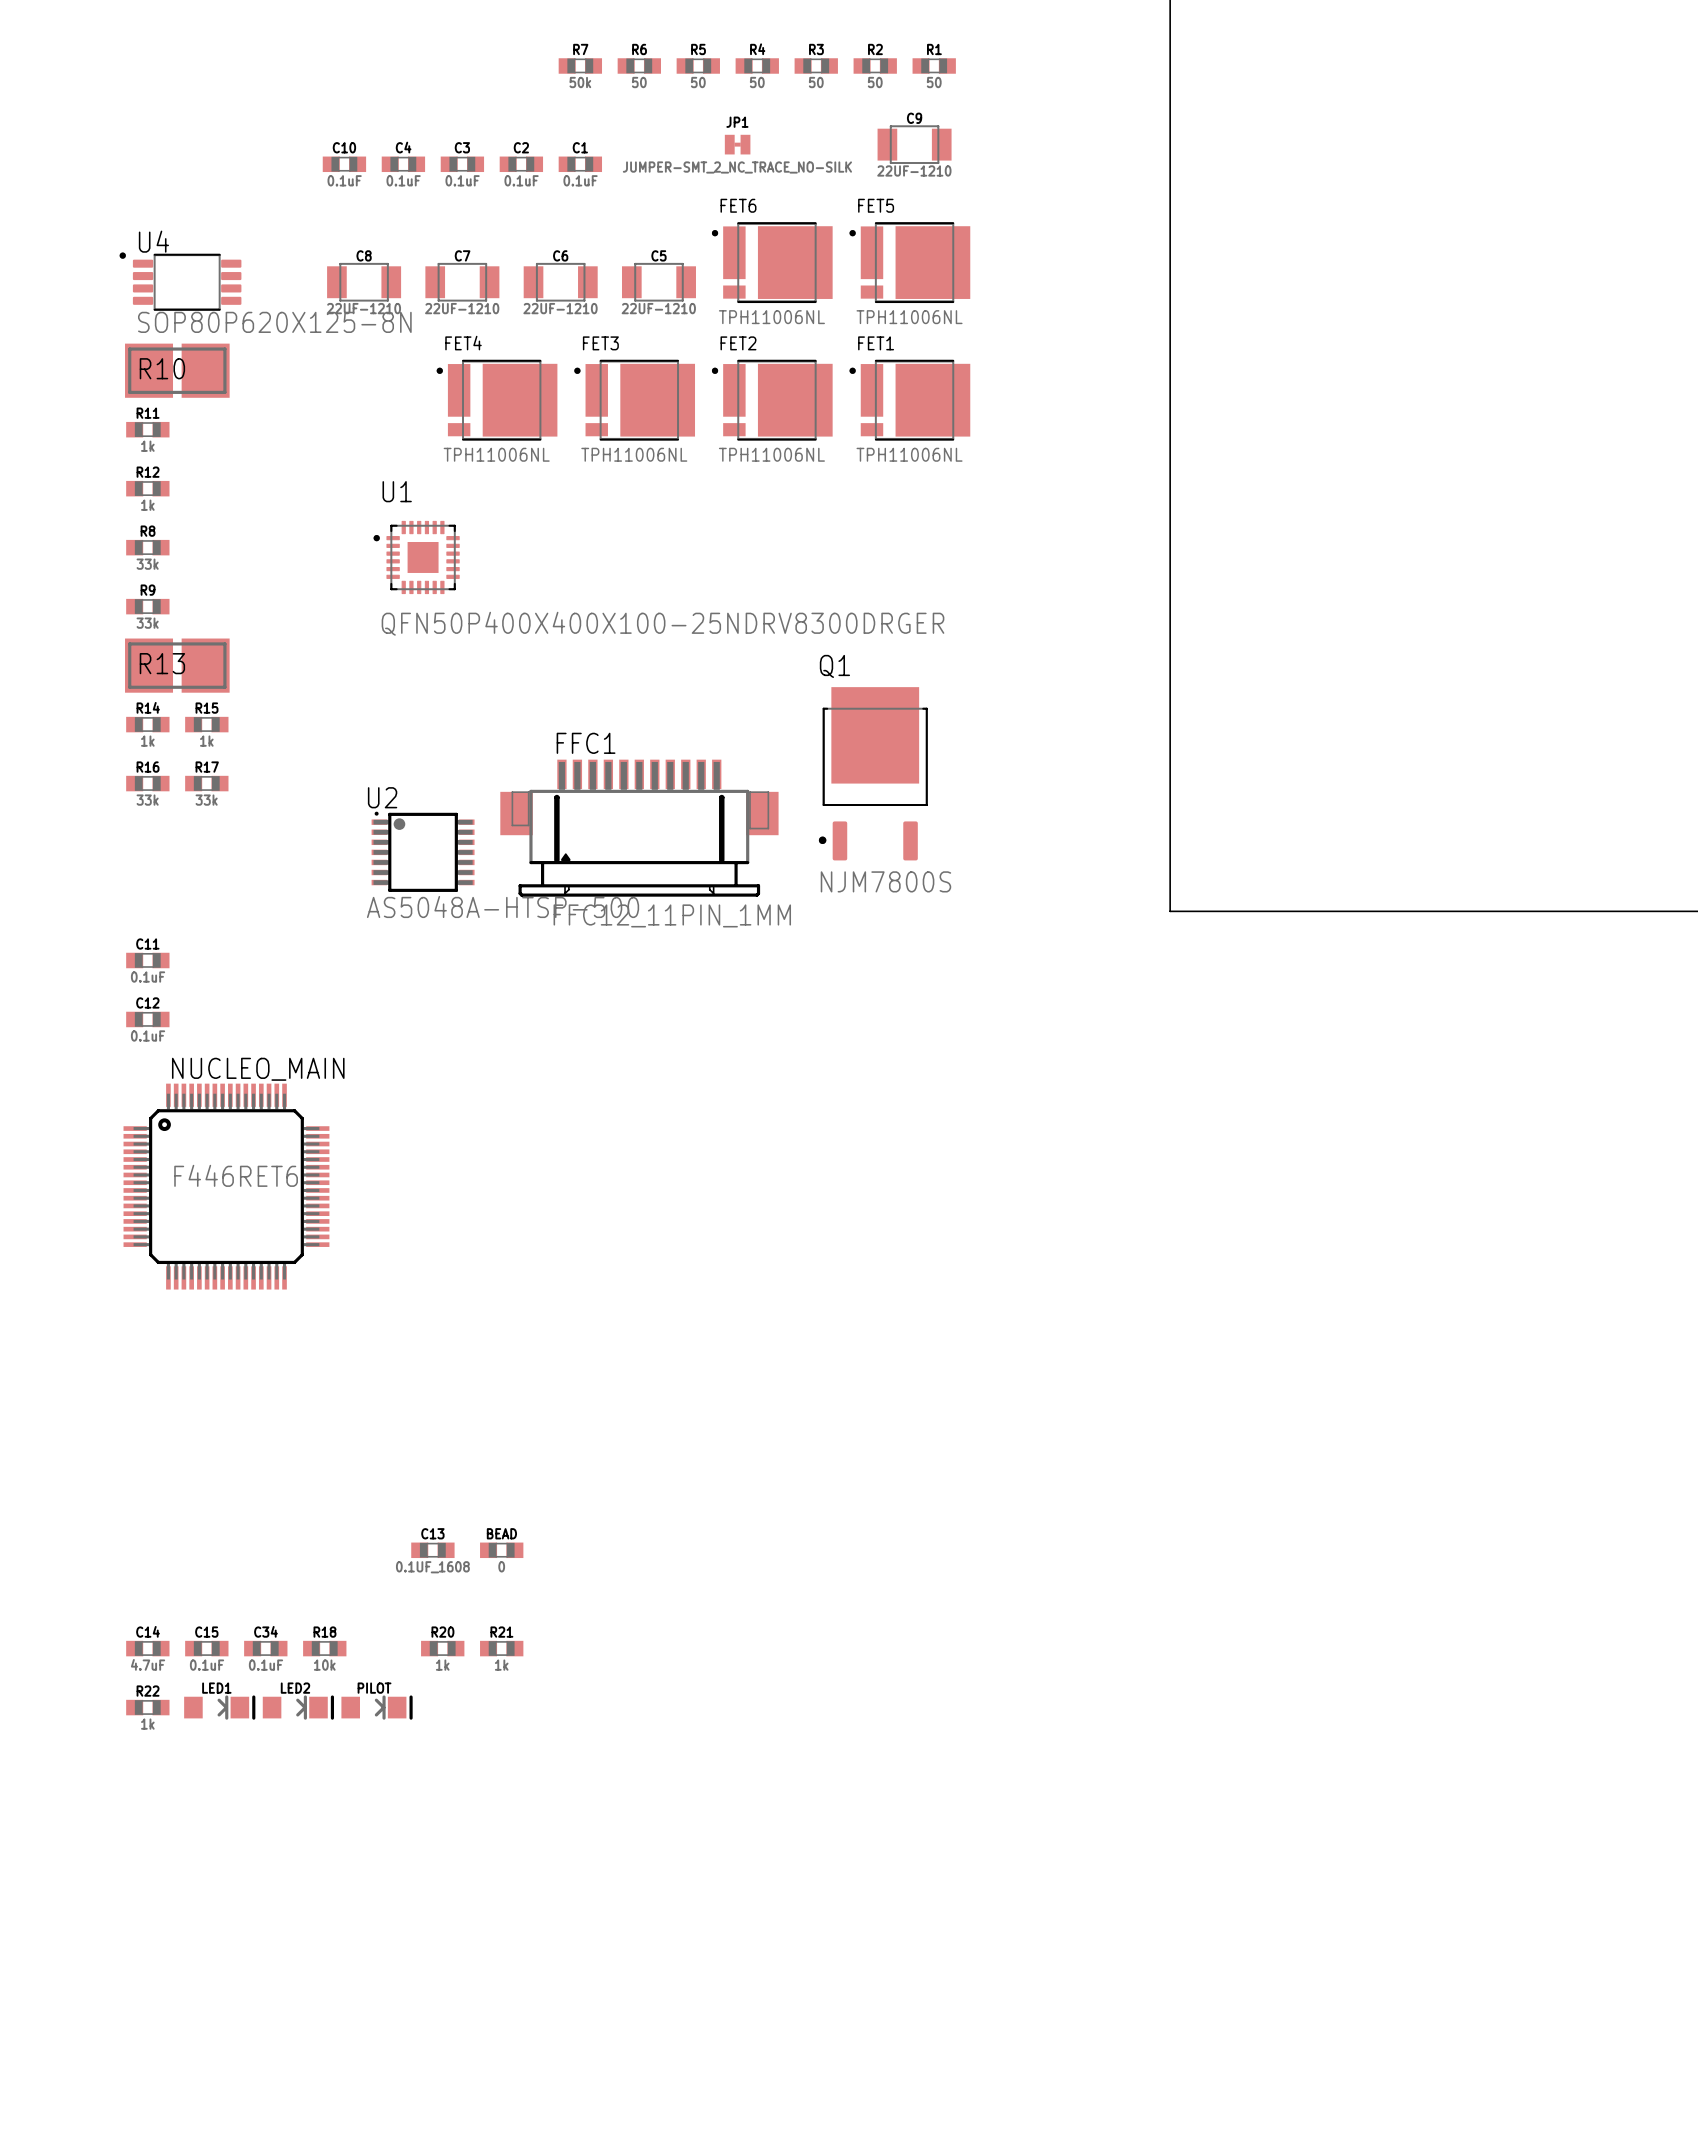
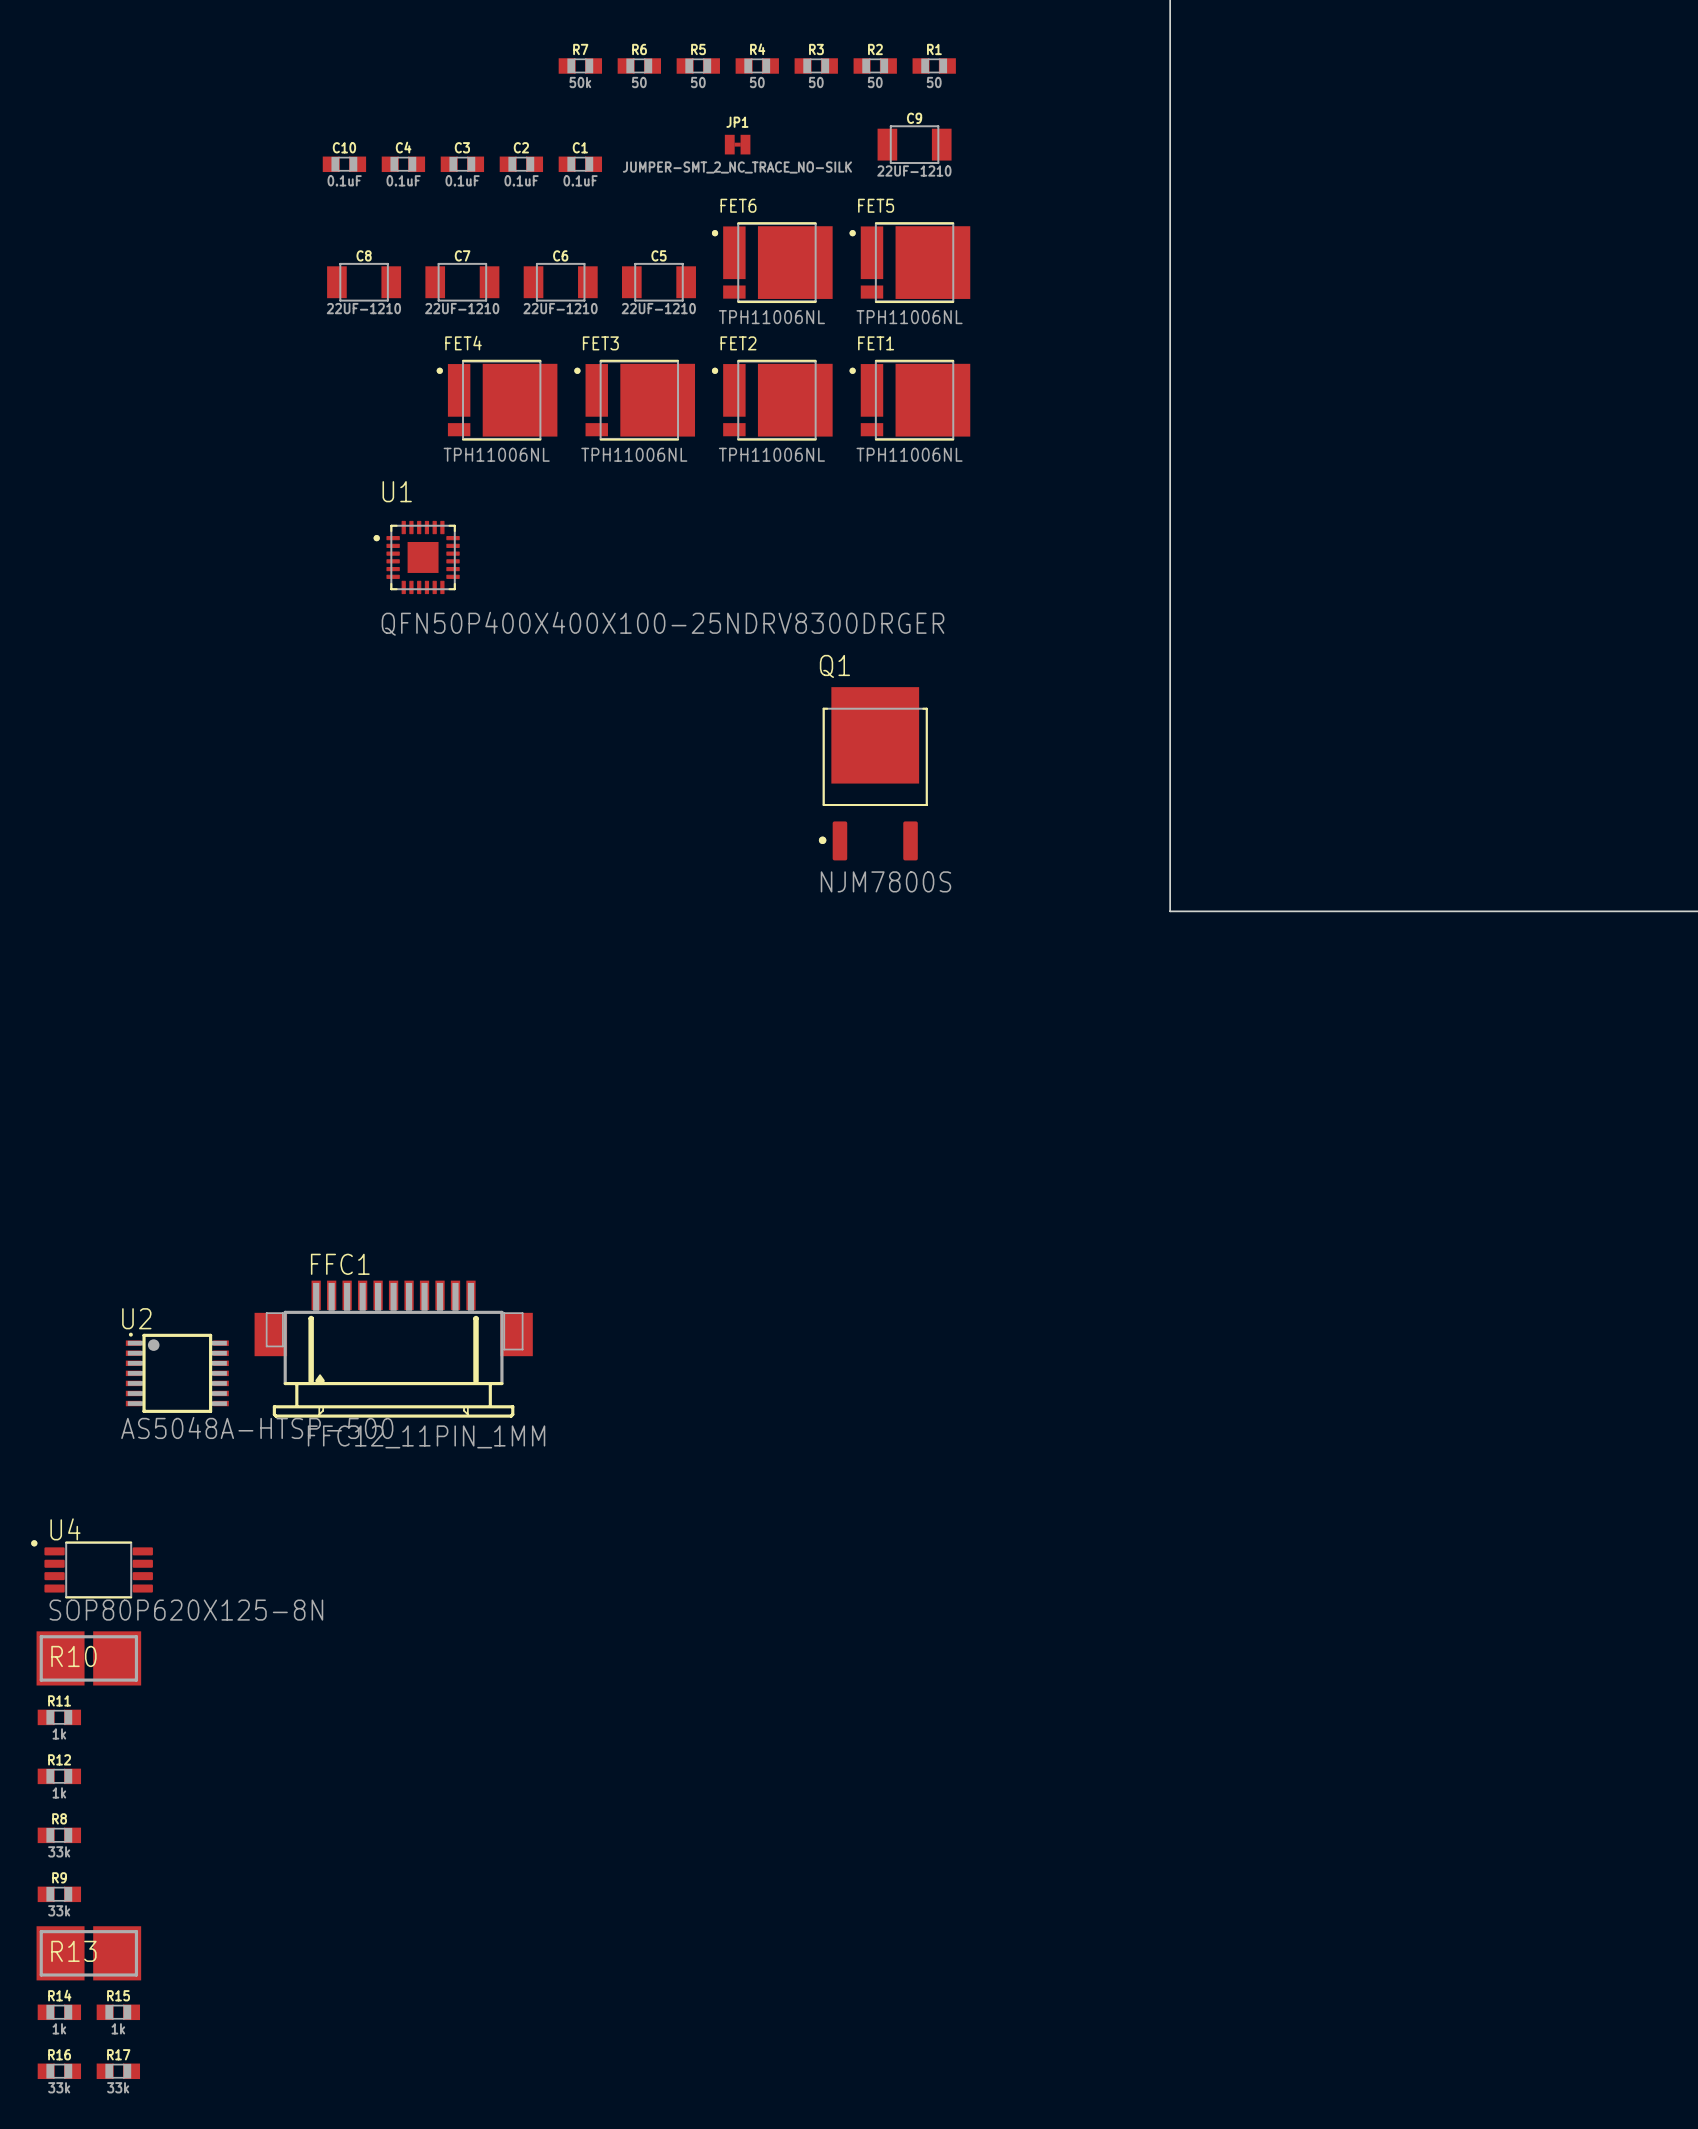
U4 position: (180, 281) -> (92, 1569)
R10 position: (177, 370) -> (88, 1658)
R11 position: (147, 429) -> (59, 1717)
R12 position: (147, 488) -> (59, 1776)
R8 position: (147, 547) -> (59, 1835)
R9 position: (147, 606) -> (59, 1894)
R13 position: (177, 665) -> (88, 1953)
R14 position: (147, 724) -> (59, 2012)
R15 position: (206, 724) -> (118, 2012)
R16 position: (147, 783) -> (59, 2071)
R17 position: (206, 783) -> (118, 2071)
FFC1 position: (639, 828) -> (393, 1349)
U2 position: (423, 851) -> (177, 1372)
C11: 0.1uF (147, 960) -> none
C12: 0.1uF (147, 1019) -> none
NUCLEO_MAIN: F446RET6 (226, 1186) -> none
C13: 0.1UF_1608 (432, 1550) -> none
BEAD: 0 (501, 1550) -> none
C14: 4.7uF (147, 1648) -> none
C15: 0.1uF (206, 1648) -> none
C34: 0.1uF (265, 1648) -> none
R18: 10k (324, 1648) -> none
R20: 1k (442, 1648) -> none
R21: 1k (501, 1648) -> none
R22: 1k (147, 1707) -> none
LED1: (219, 1707) -> none
LED2: (298, 1707) -> none
PILOT: (377, 1707) -> none

